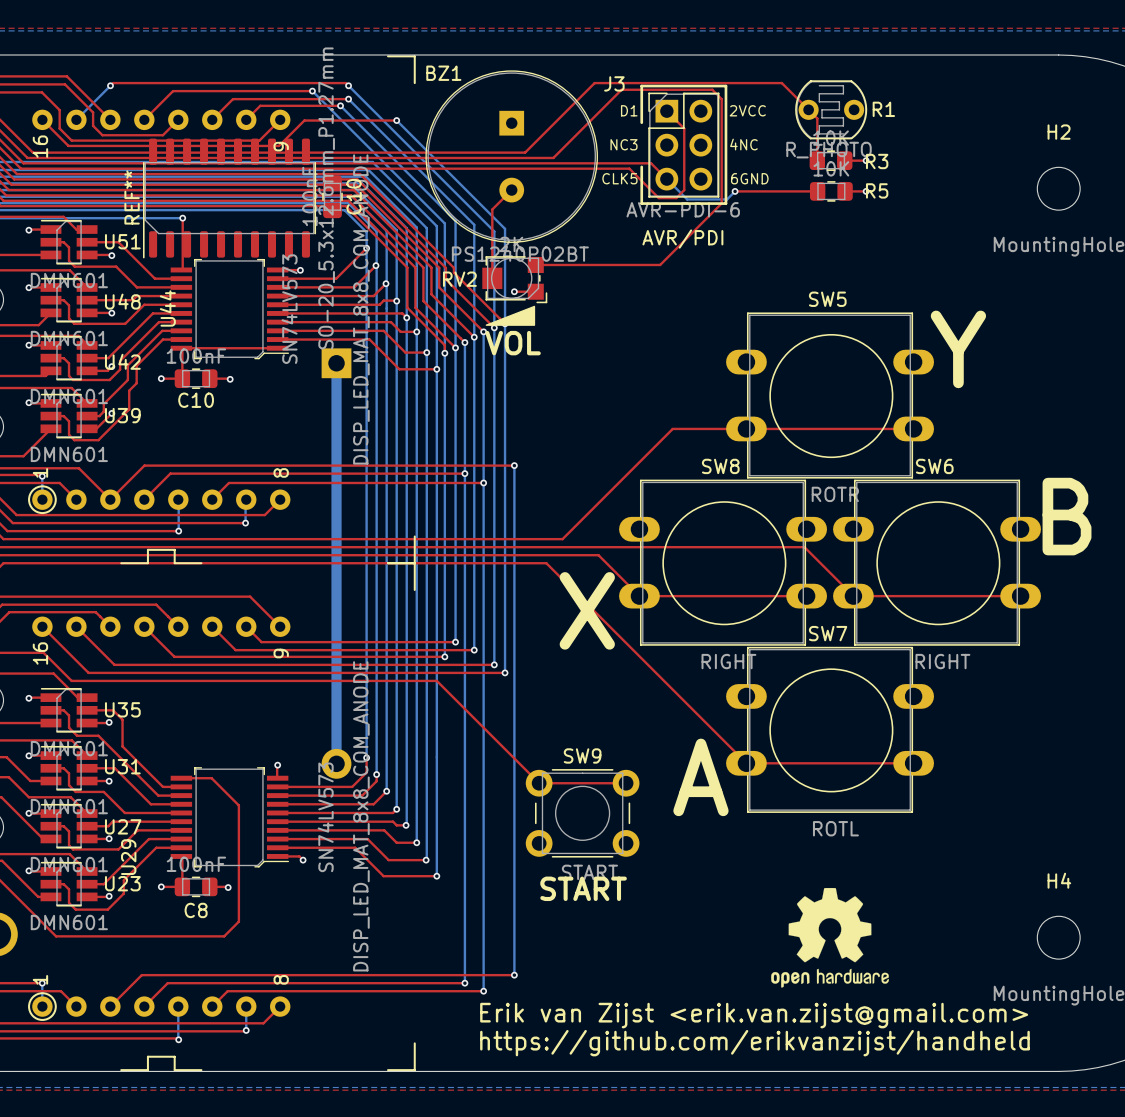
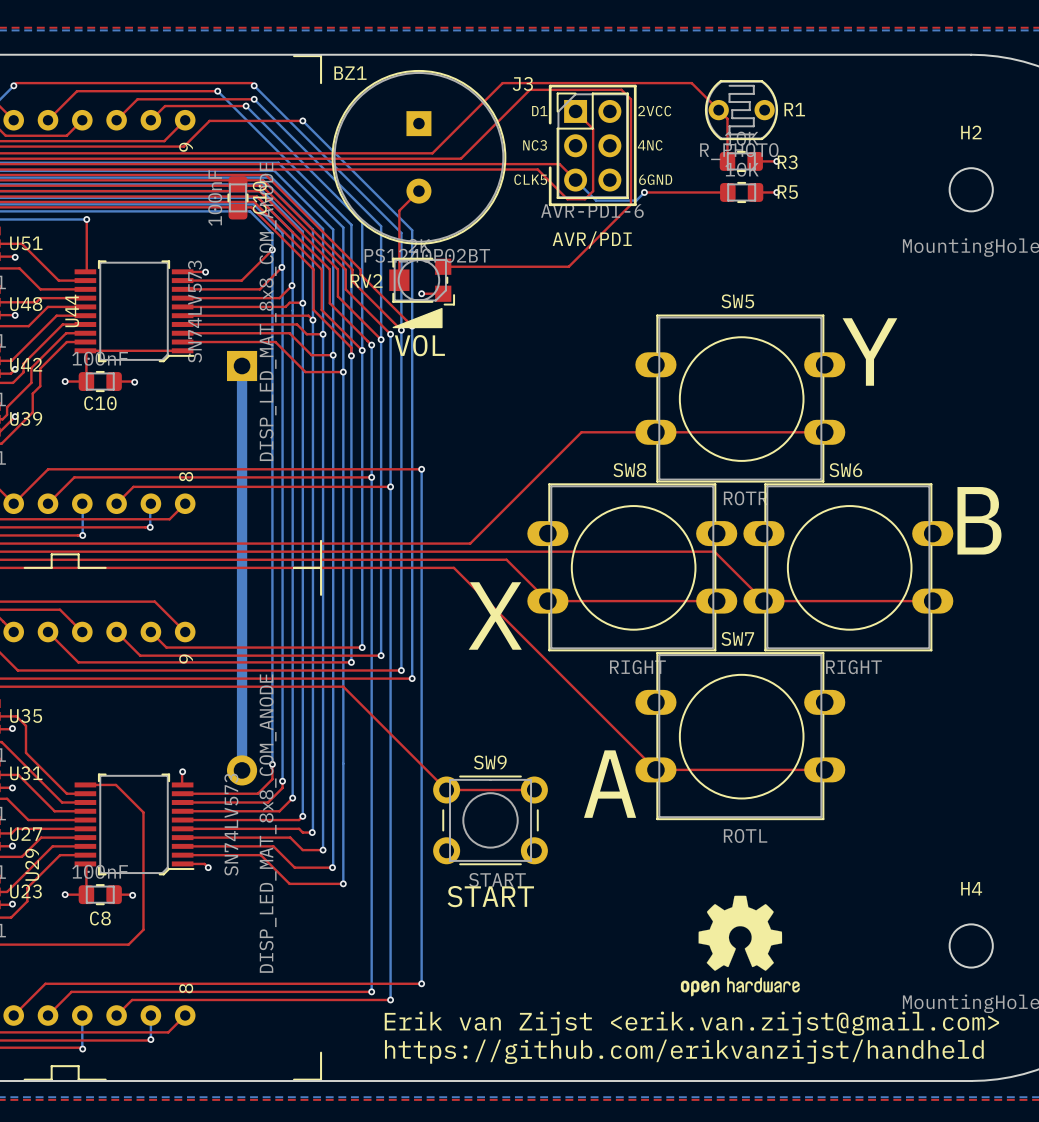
REF**: SO-20_5.3x12.6mm_P1.27mm (229, 198) -> none

